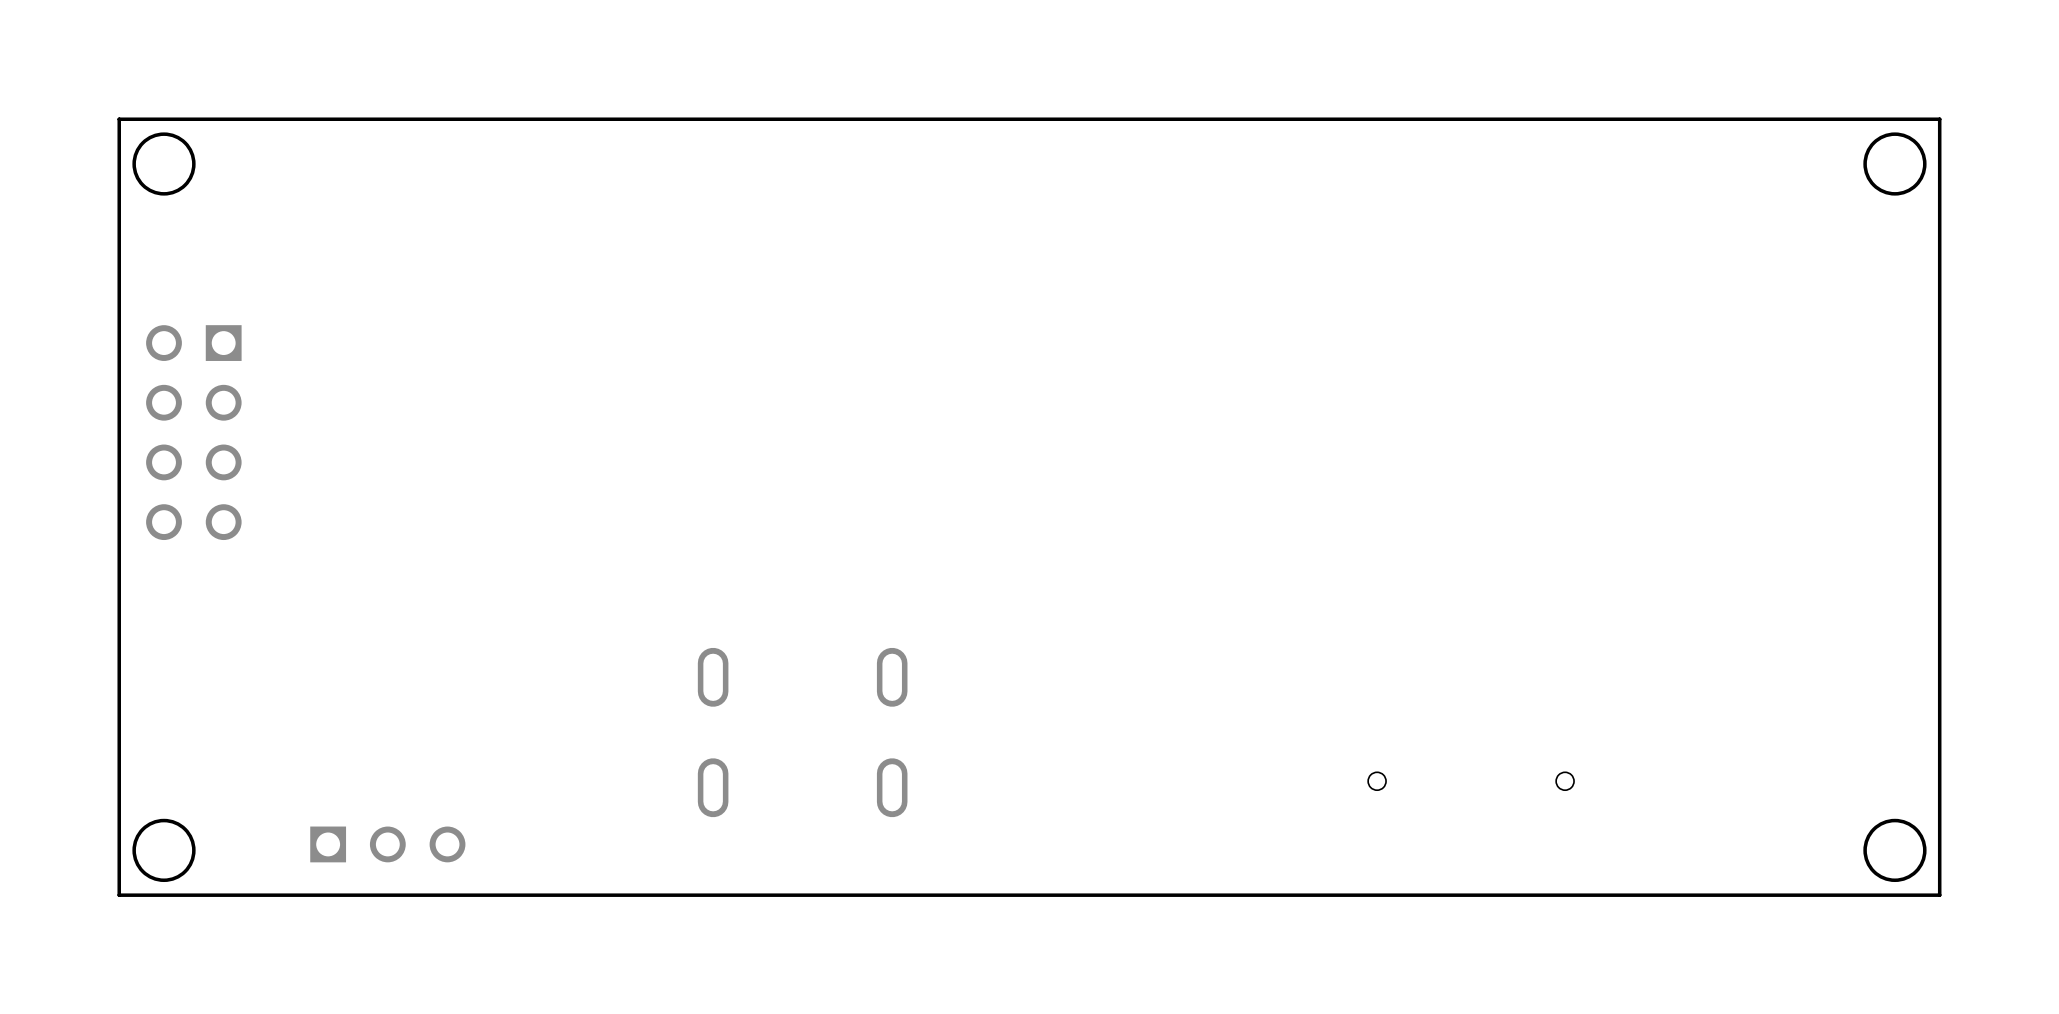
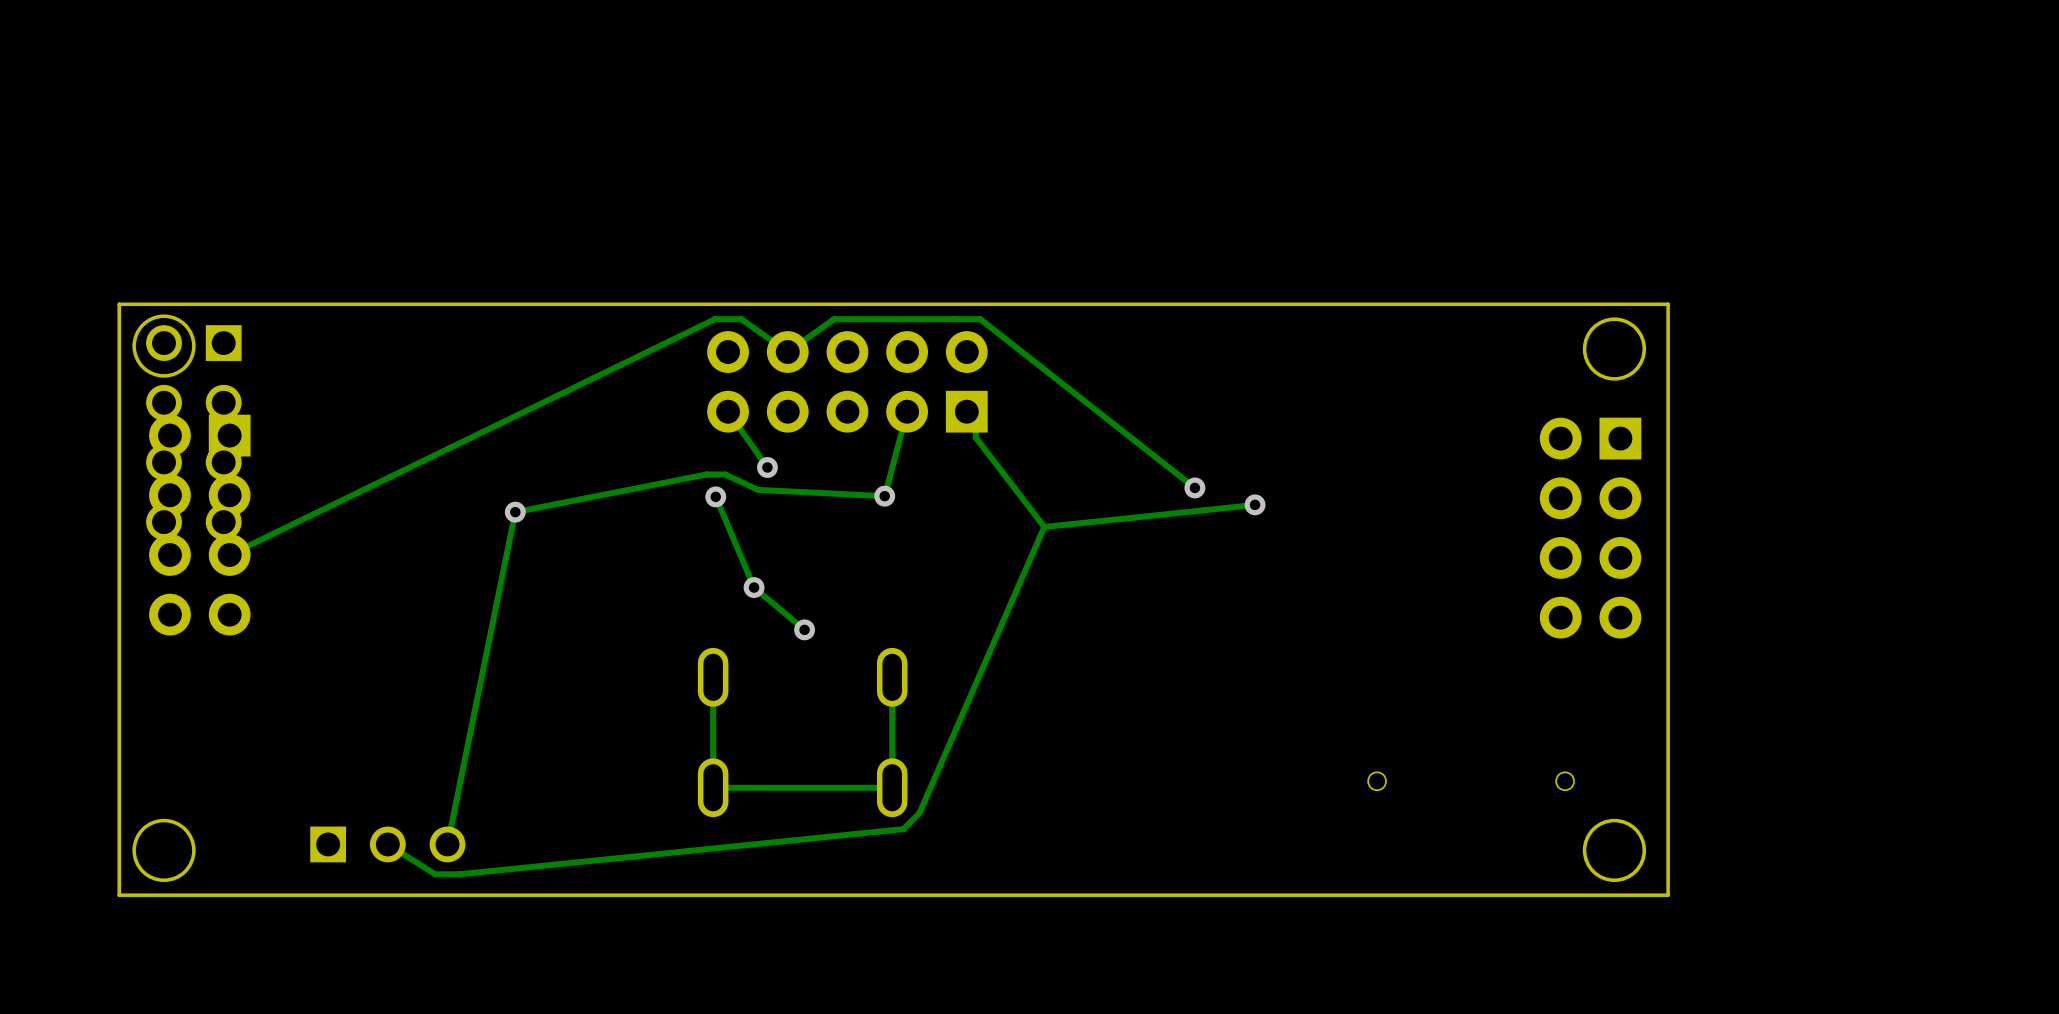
round board edge: [1863, 132, 1927, 196] -> none
round board edge position: (164, 164) -> (164, 346)
board edge: (119, 304) (119, 119) (1939, 119) (1939, 895) (1668, 895) -> (119, 304) (1668, 304) (1668, 895)
round board edge: none -> [1582, 317, 1647, 381]
part: none -> (847, 381)
track: none -> (728, 411) (767, 467)
track: none -> (907, 411) (884, 496) (758, 489) (725, 474) (706, 474) (515, 512) (447, 844)
track: none -> (966, 411) (975, 429) (975, 437) (1044, 526)
via: none -> (767, 467)
track: none -> (1194, 487) (979, 319) (834, 319) (787, 352) (742, 319) (715, 319) (229, 554)
via: none -> (1194, 487)
track: none -> (715, 496) (754, 587) (804, 629)
via: none -> (715, 496)
via: none -> (884, 496)
track: none -> (1255, 504) (1044, 526)
via: none -> (1255, 504)
via: none -> (515, 512)
part: none -> (199, 525)
track: none -> (1044, 526) (919, 813) (903, 829) (459, 874) (435, 874) (387, 844)
part: none -> (1590, 528)
via: none -> (754, 587)
via: none -> (804, 629)
track: none -> (892, 677) (892, 787) (713, 787) (713, 677)
round board edge position: (1894, 850) -> (1614, 850)

